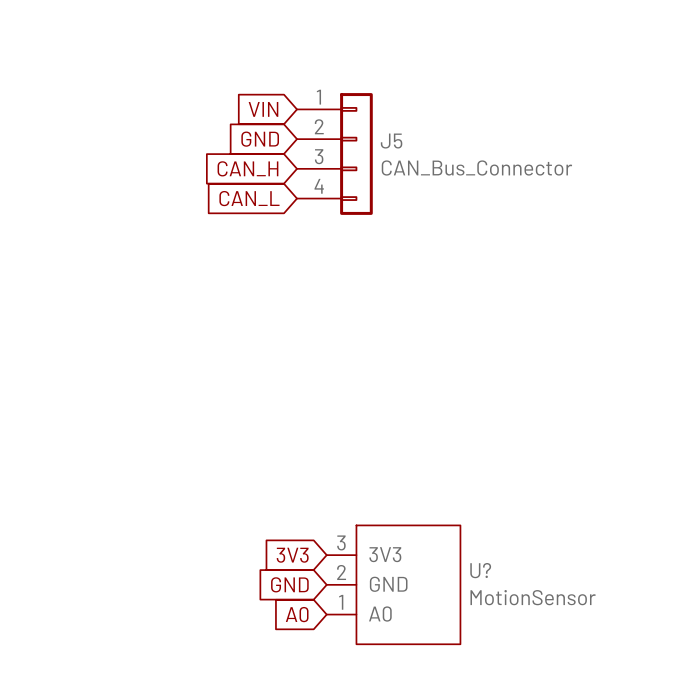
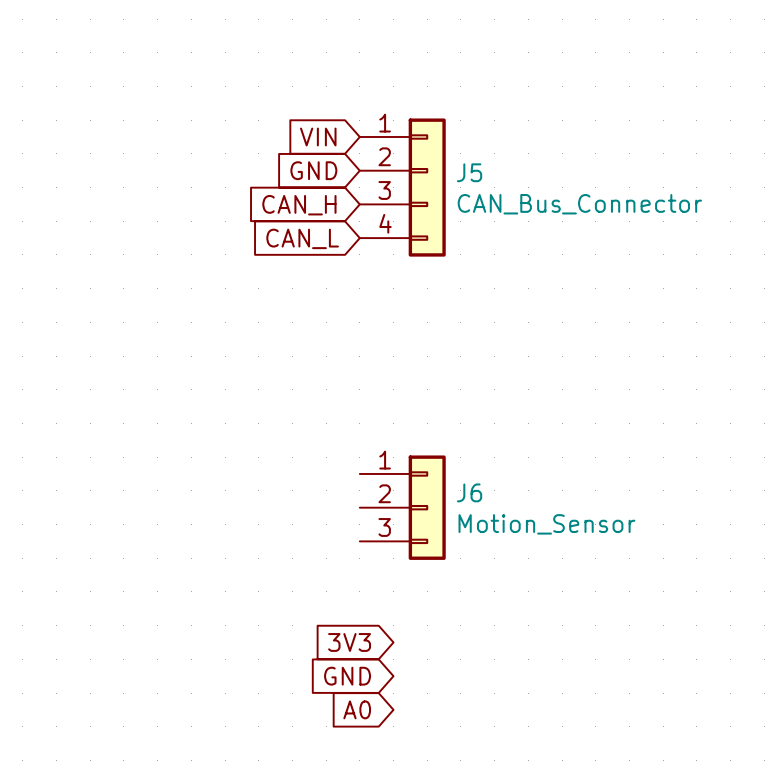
J6: none -> Motion_Sensor (402, 507)
U?: MotionSensor (393, 584) -> none

